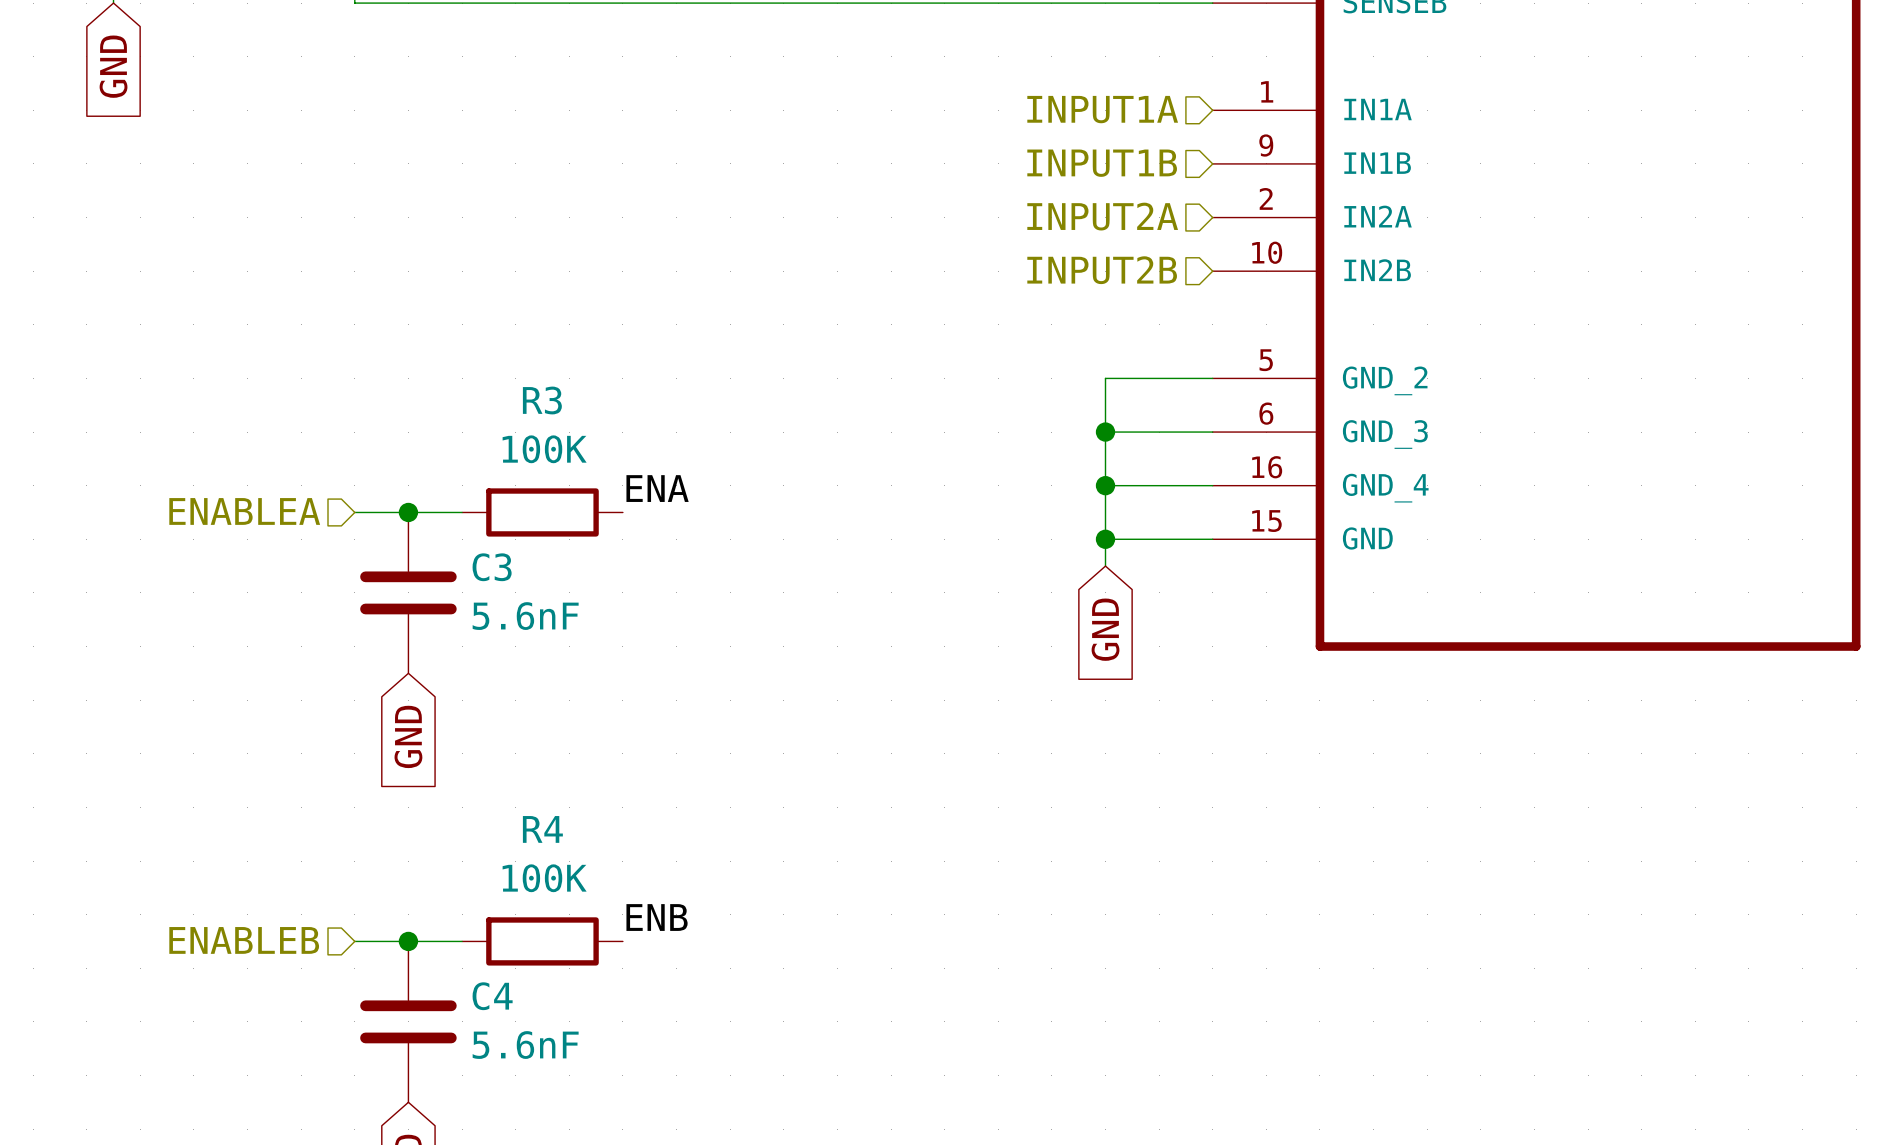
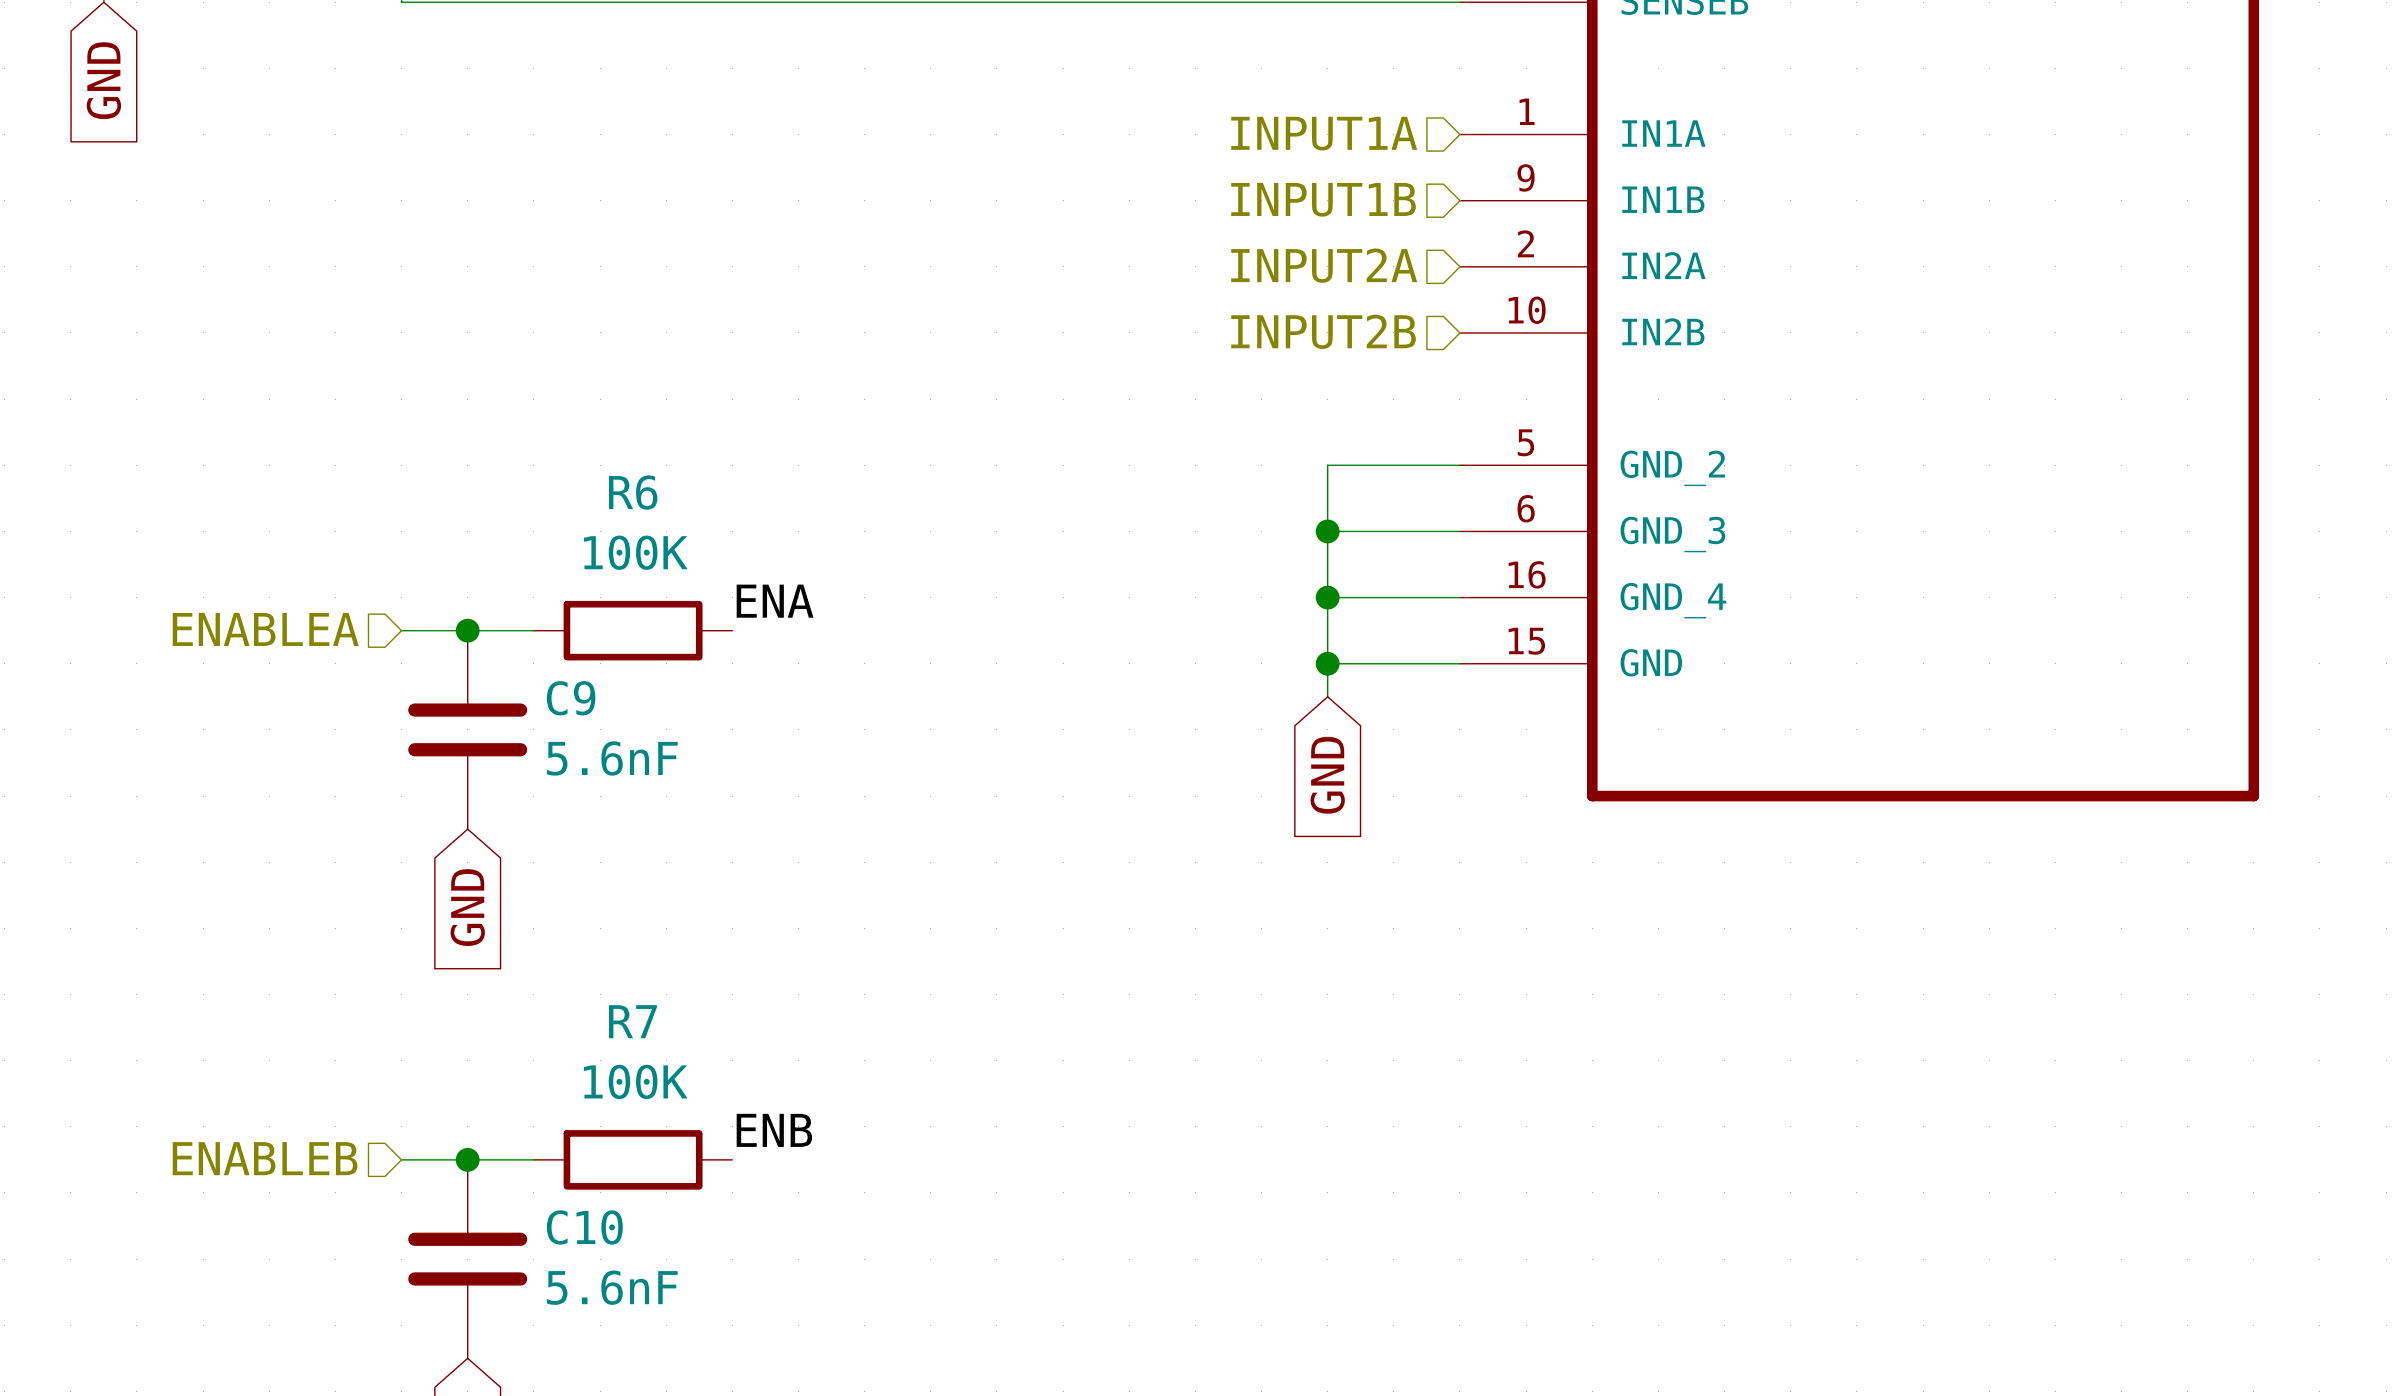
R3 name: R3 (542, 400) -> R6 (633, 492)
C3 name: C3 (492, 567) -> C9 (571, 698)
R4 name: R4 (542, 829) -> R7 (632, 1021)
C4 name: C4 (492, 996) -> C10 (584, 1227)

